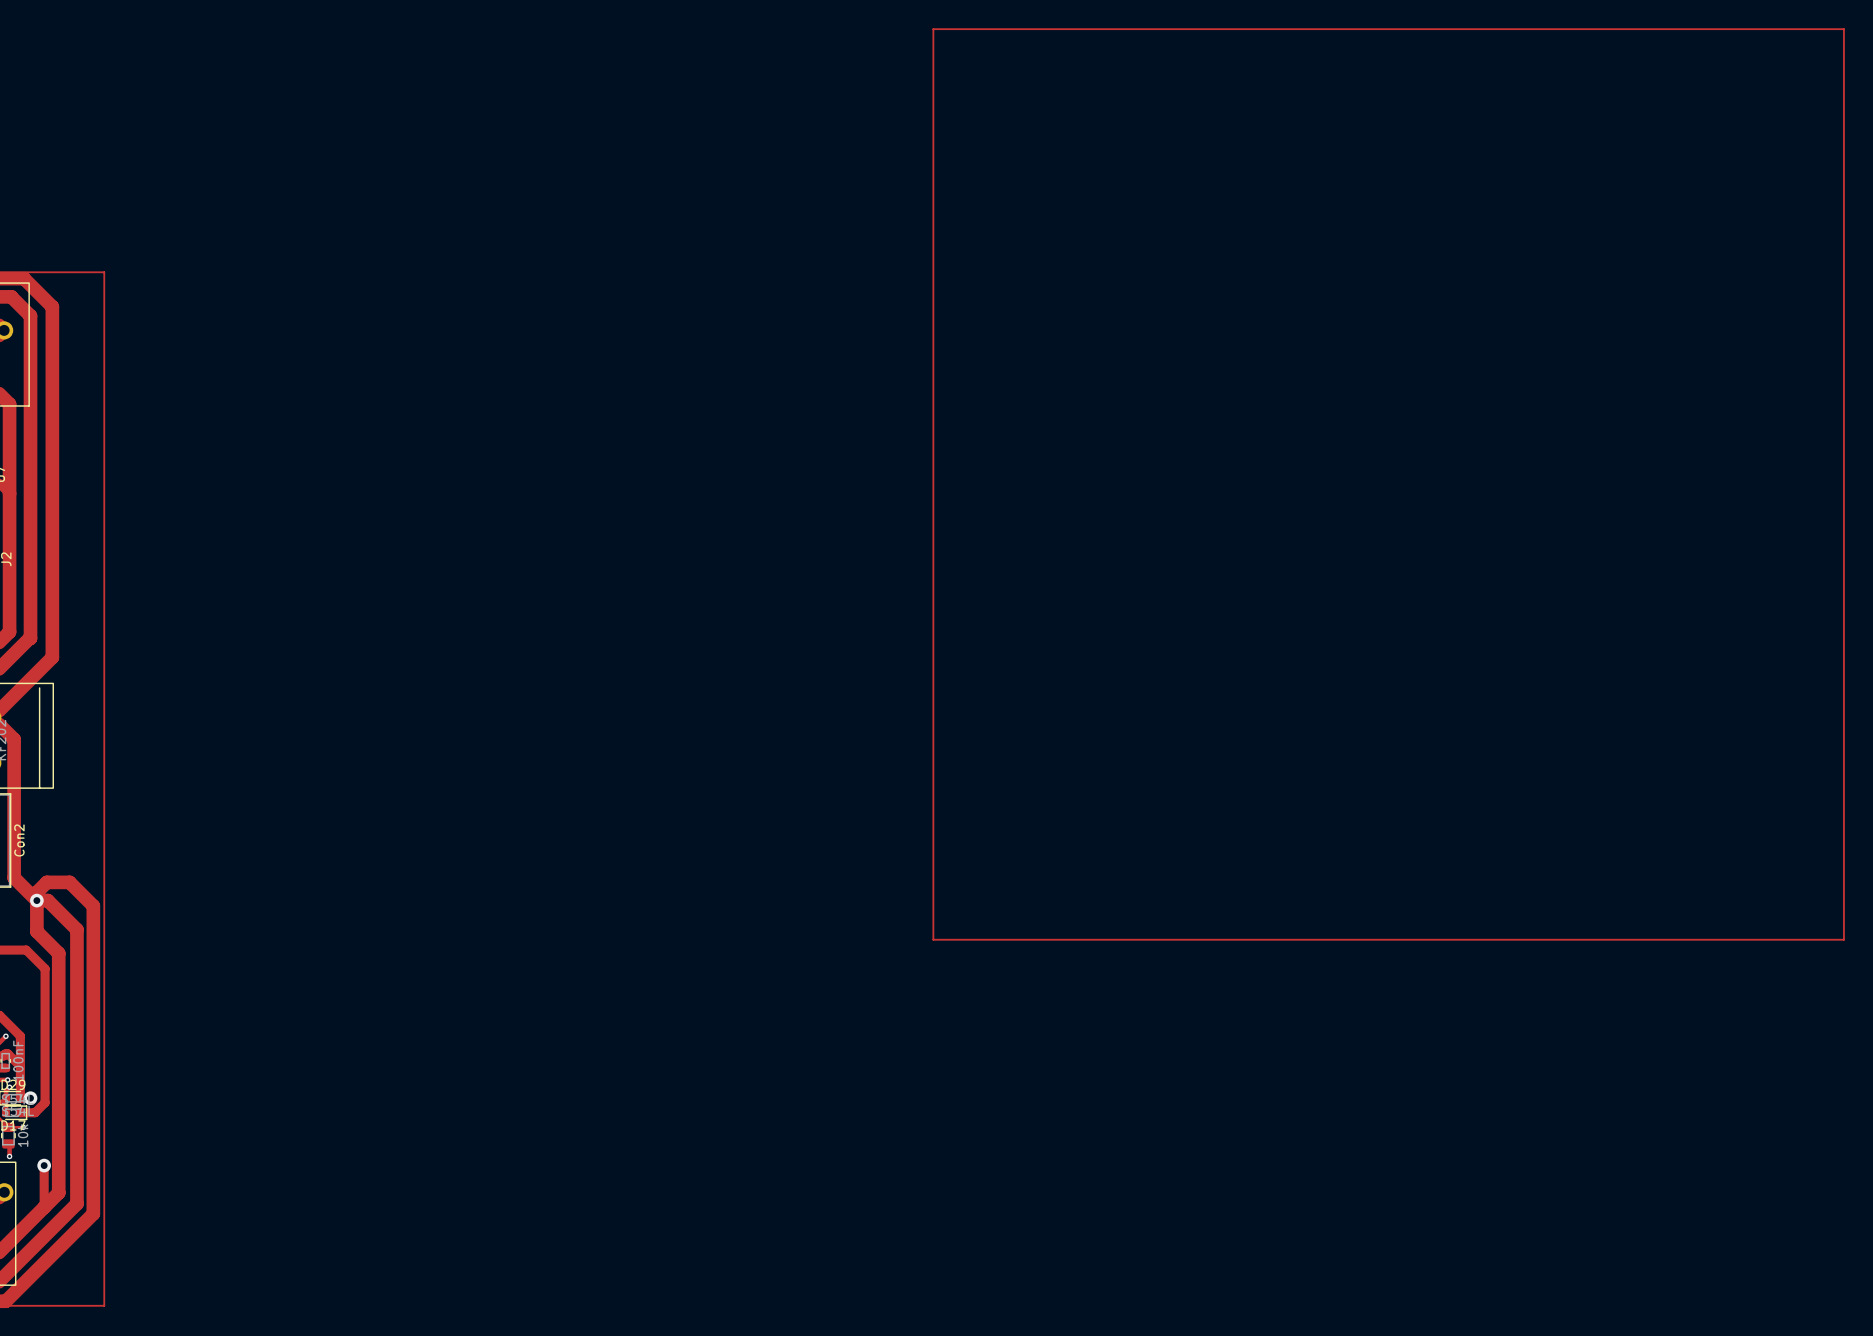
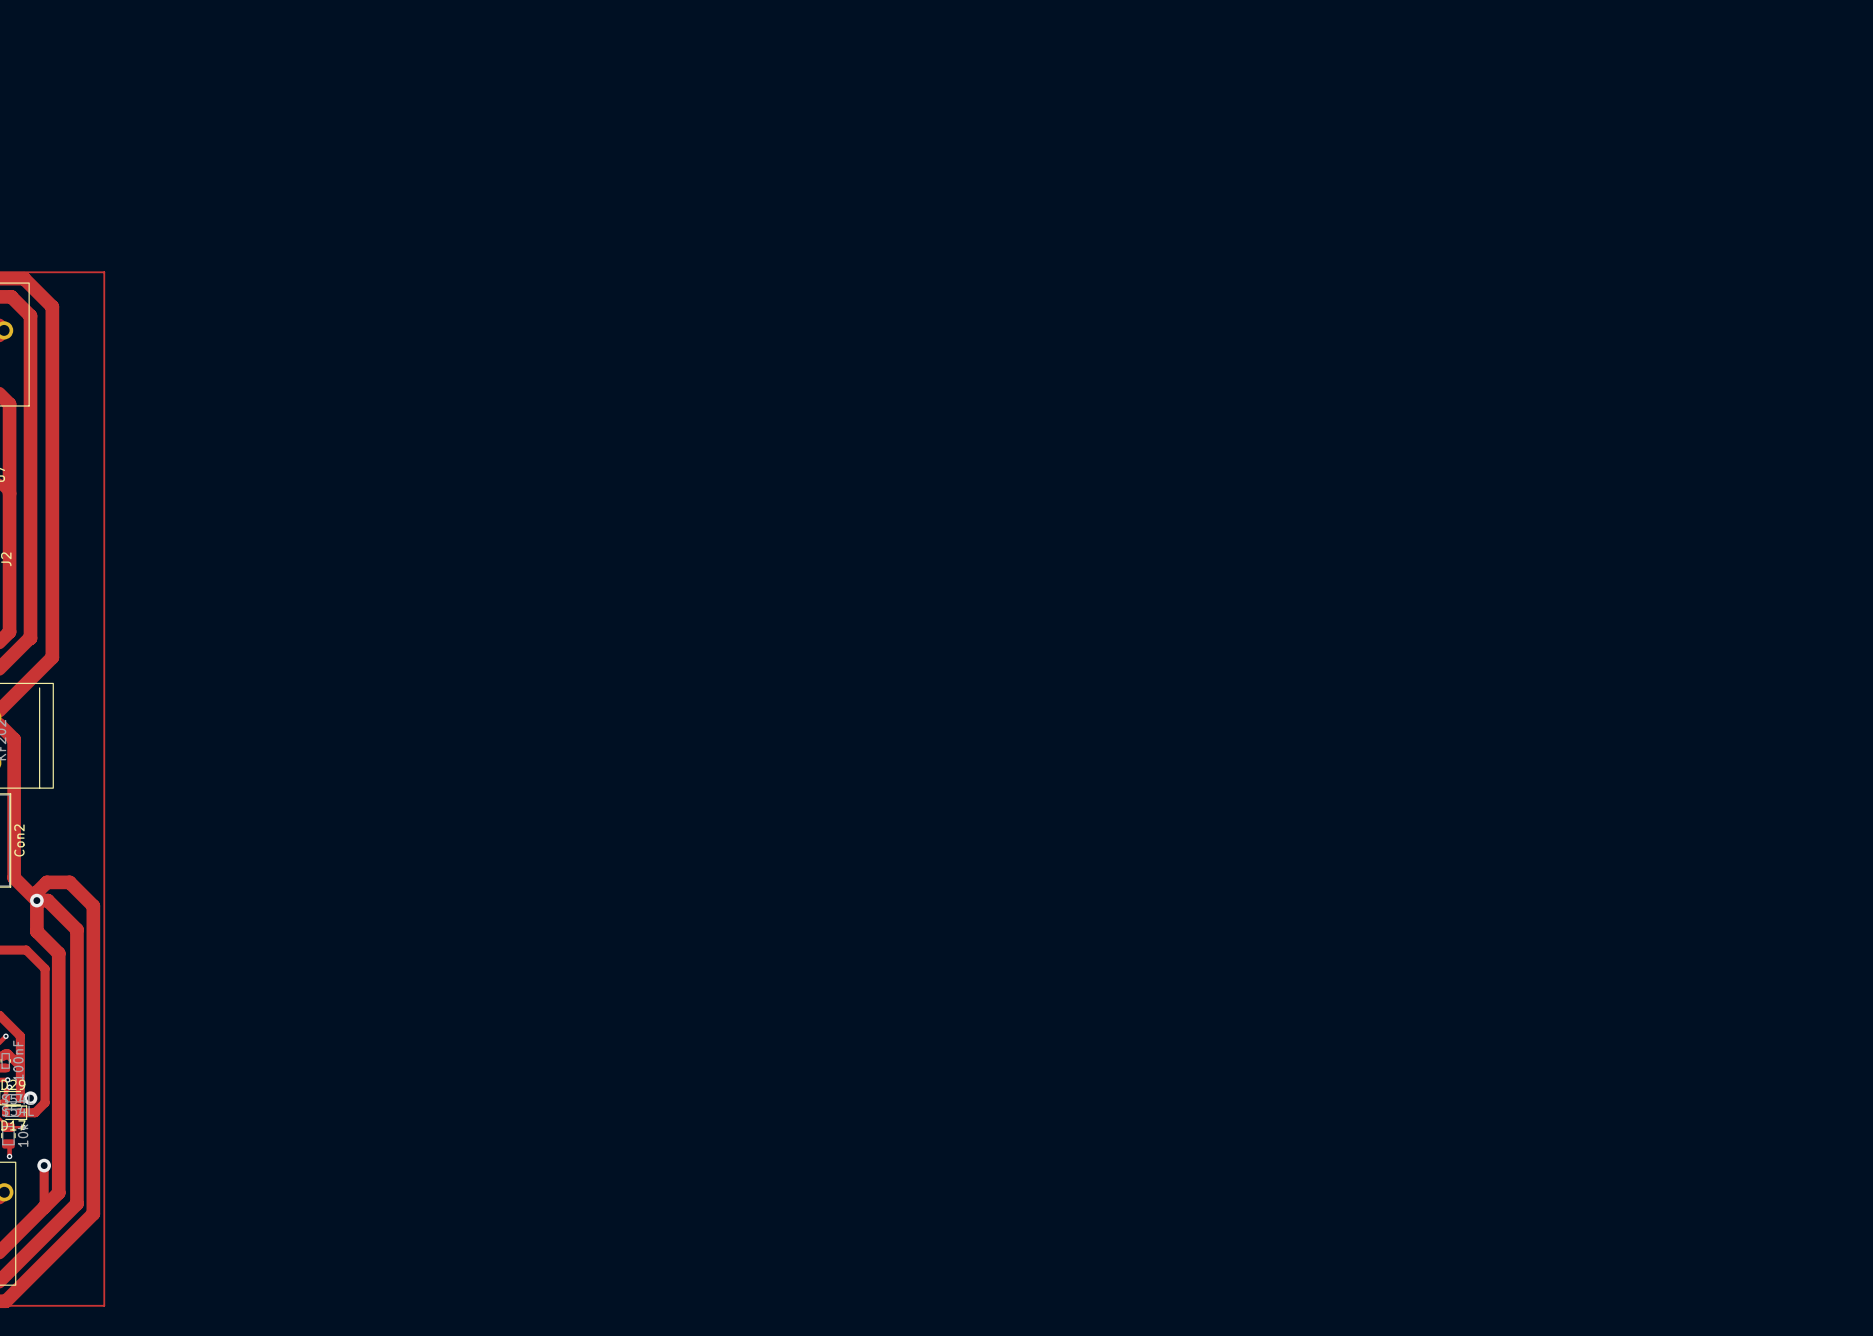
track: (933, 29) (1843, 29) (1843, 939) (933, 939) (933, 29) -> none

